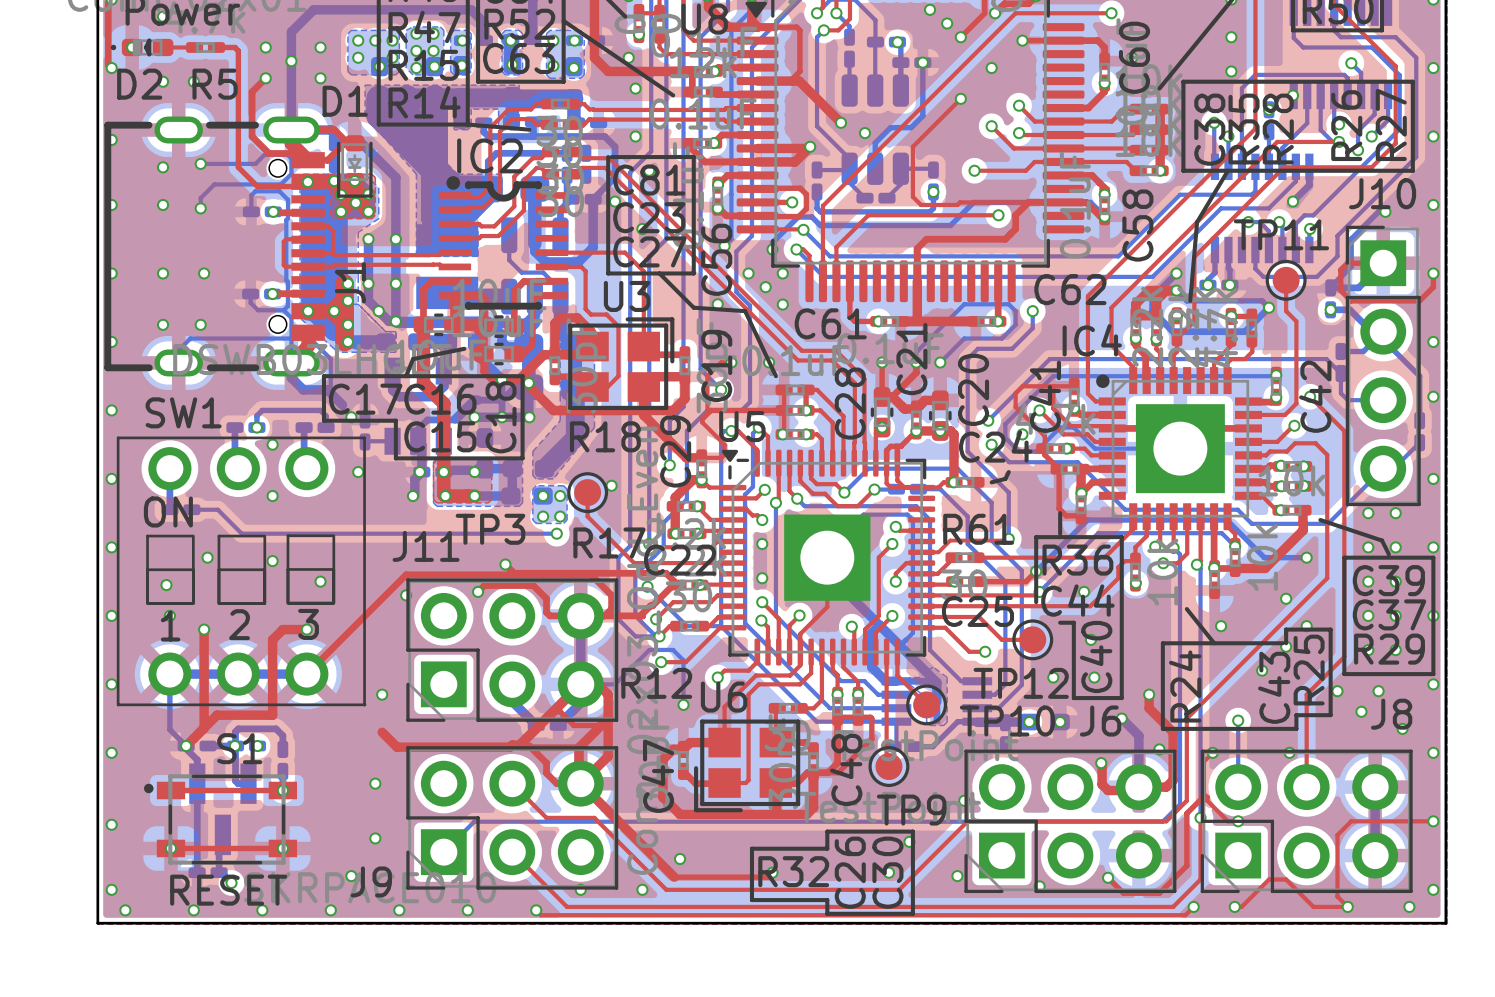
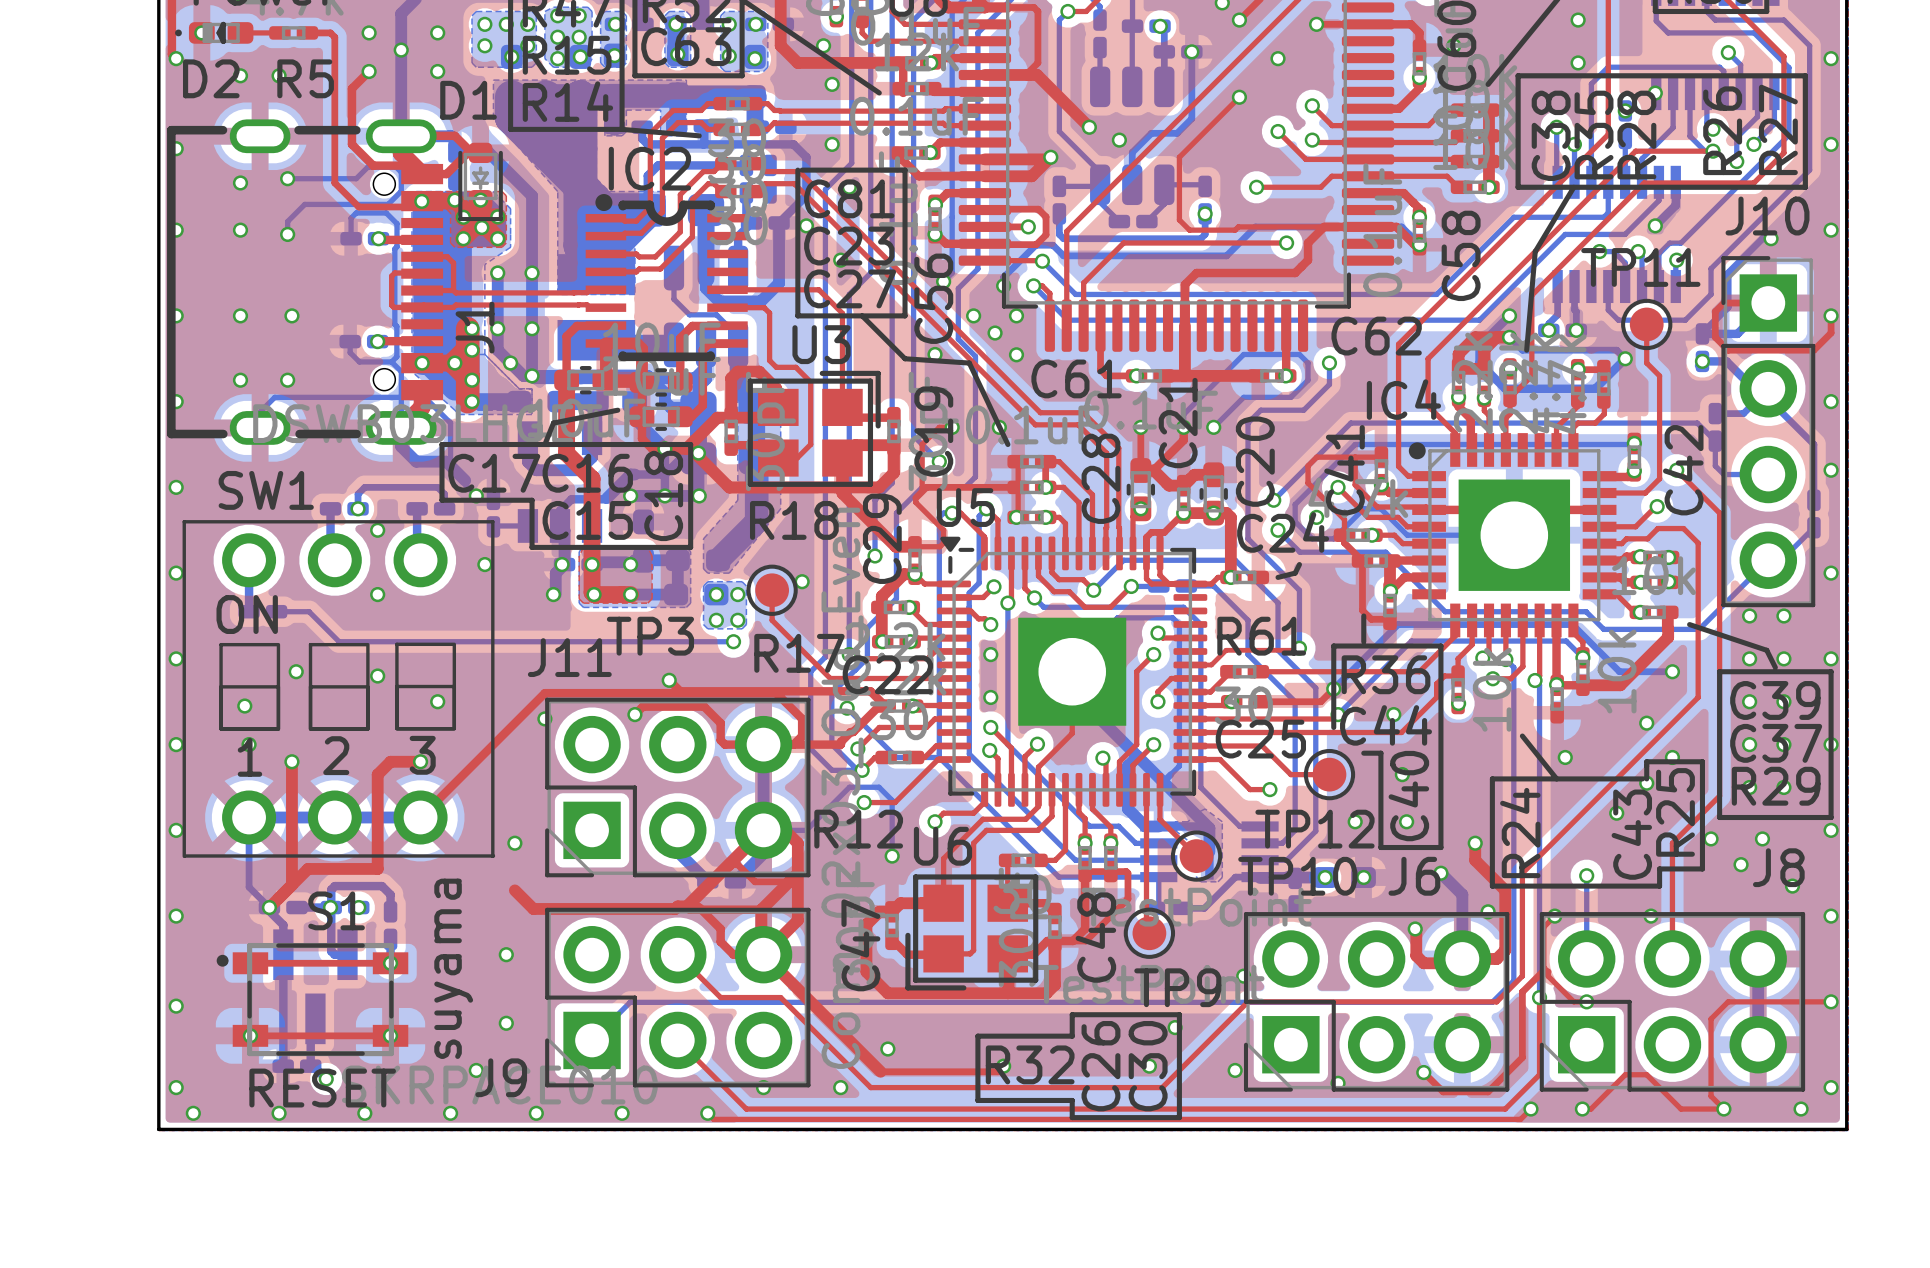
text: none -> suyama (453, 968)

